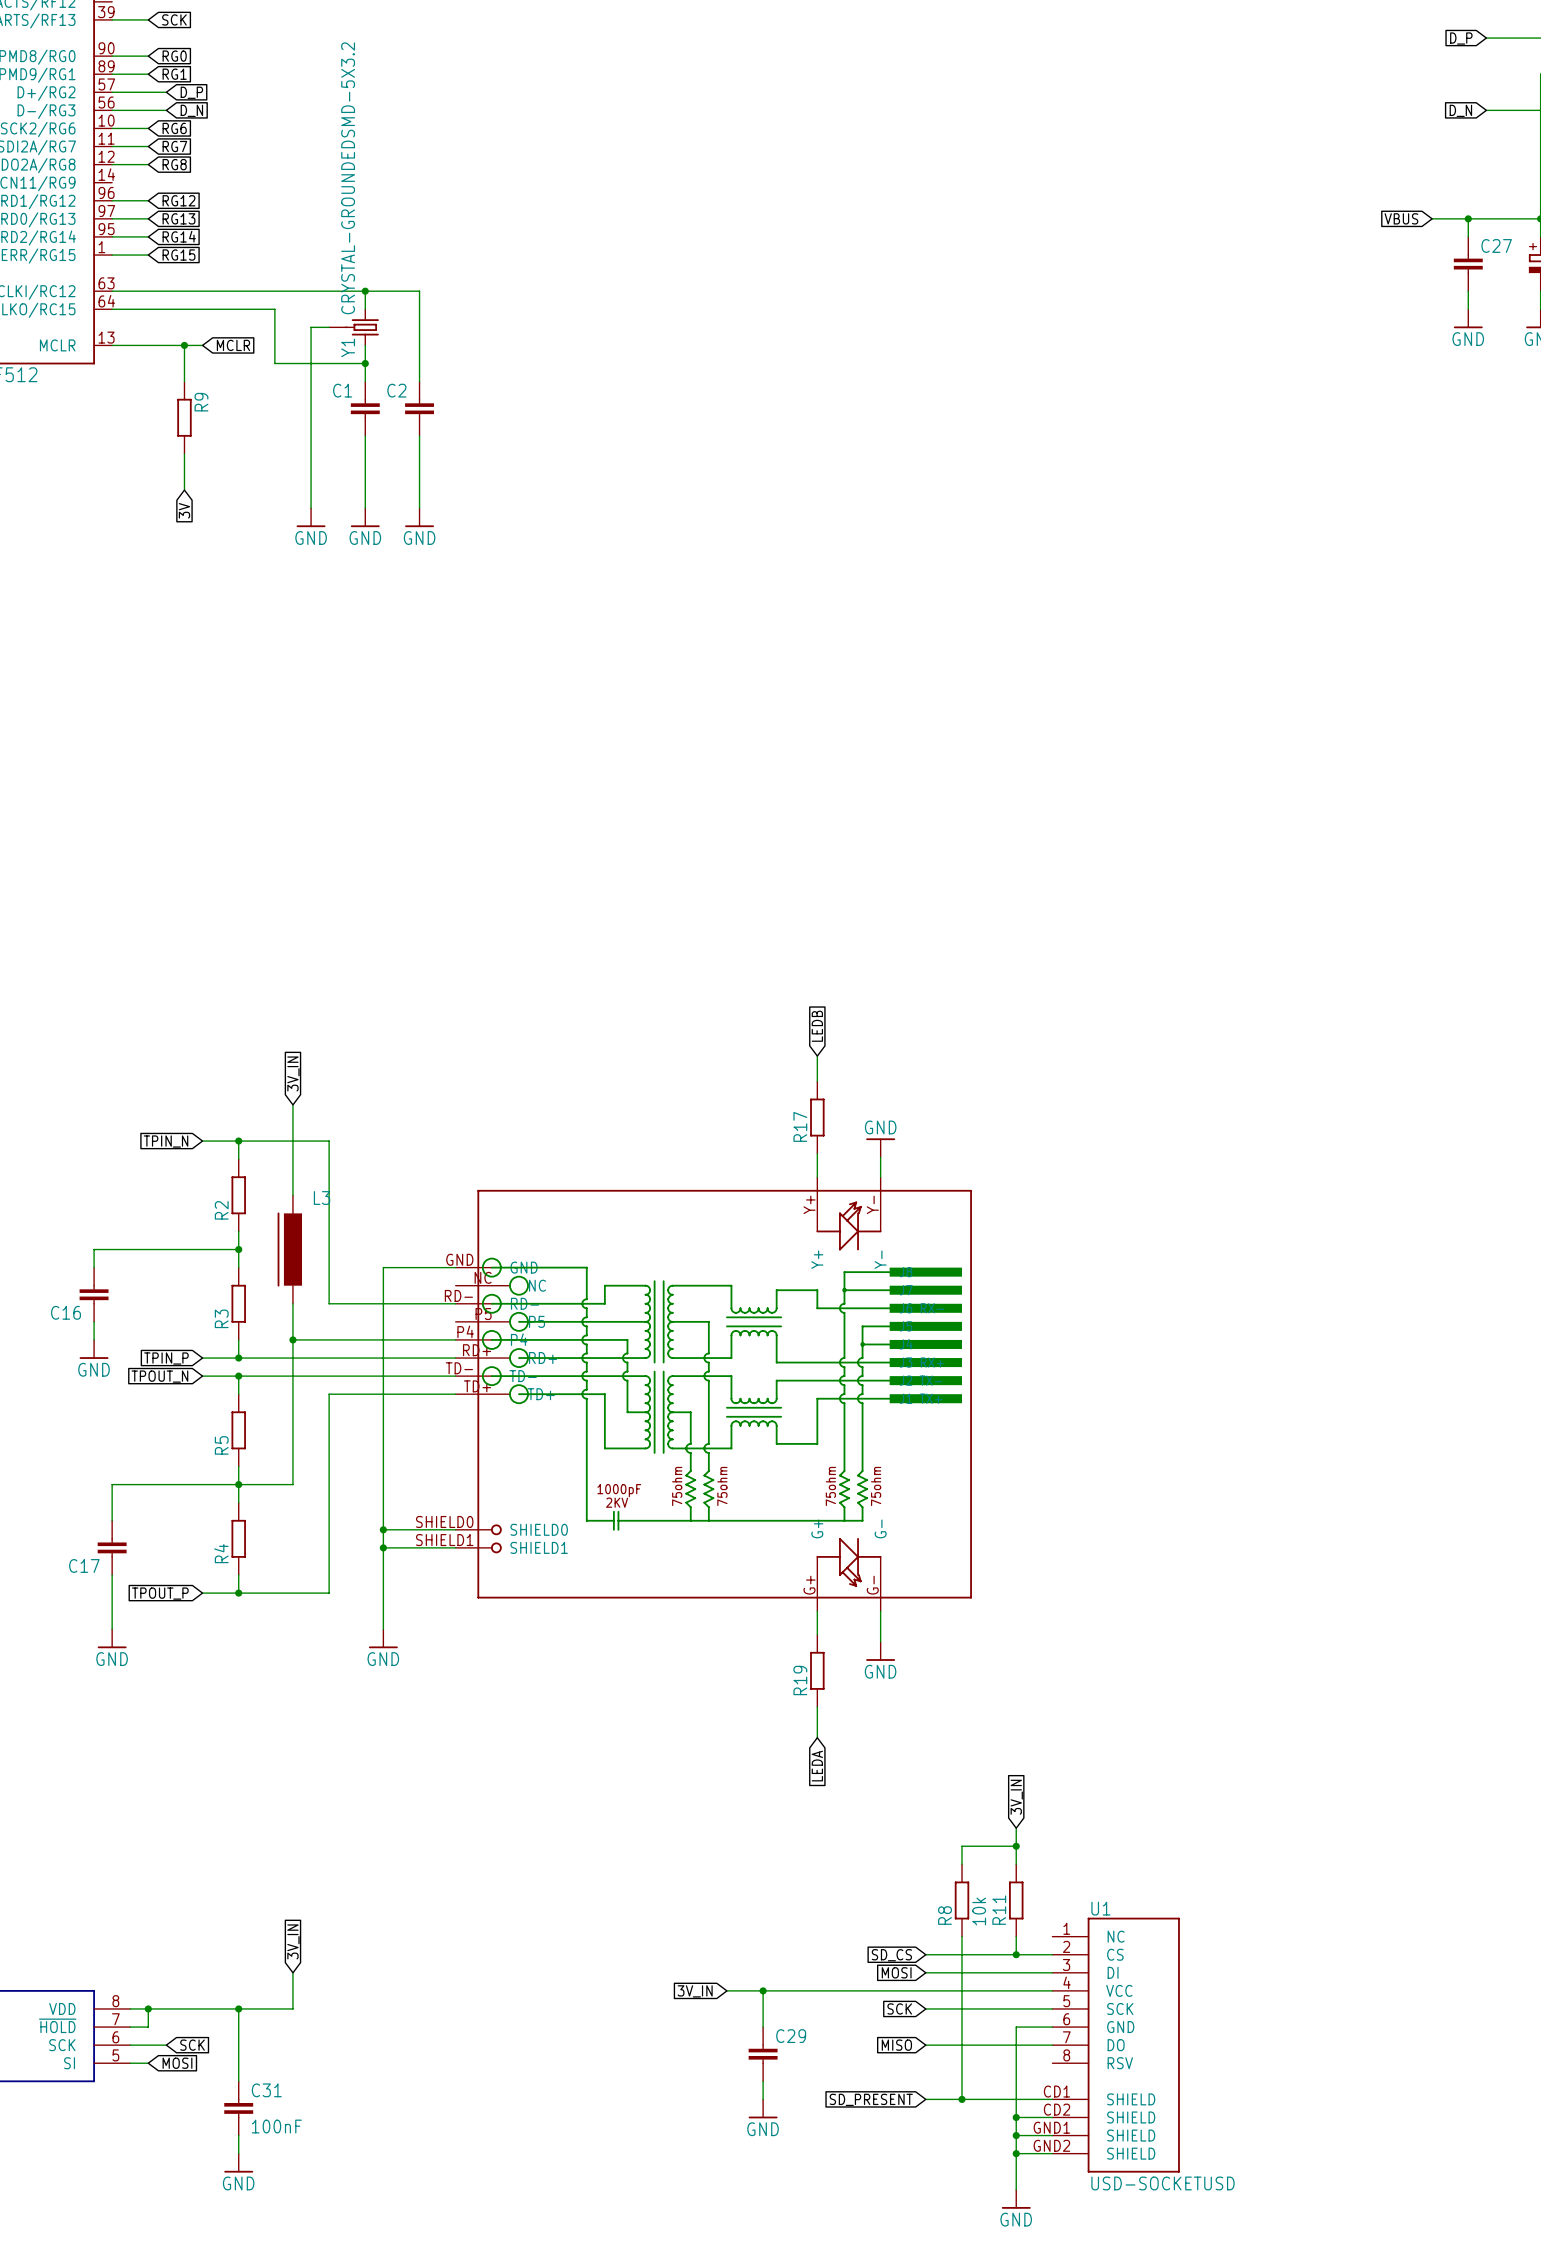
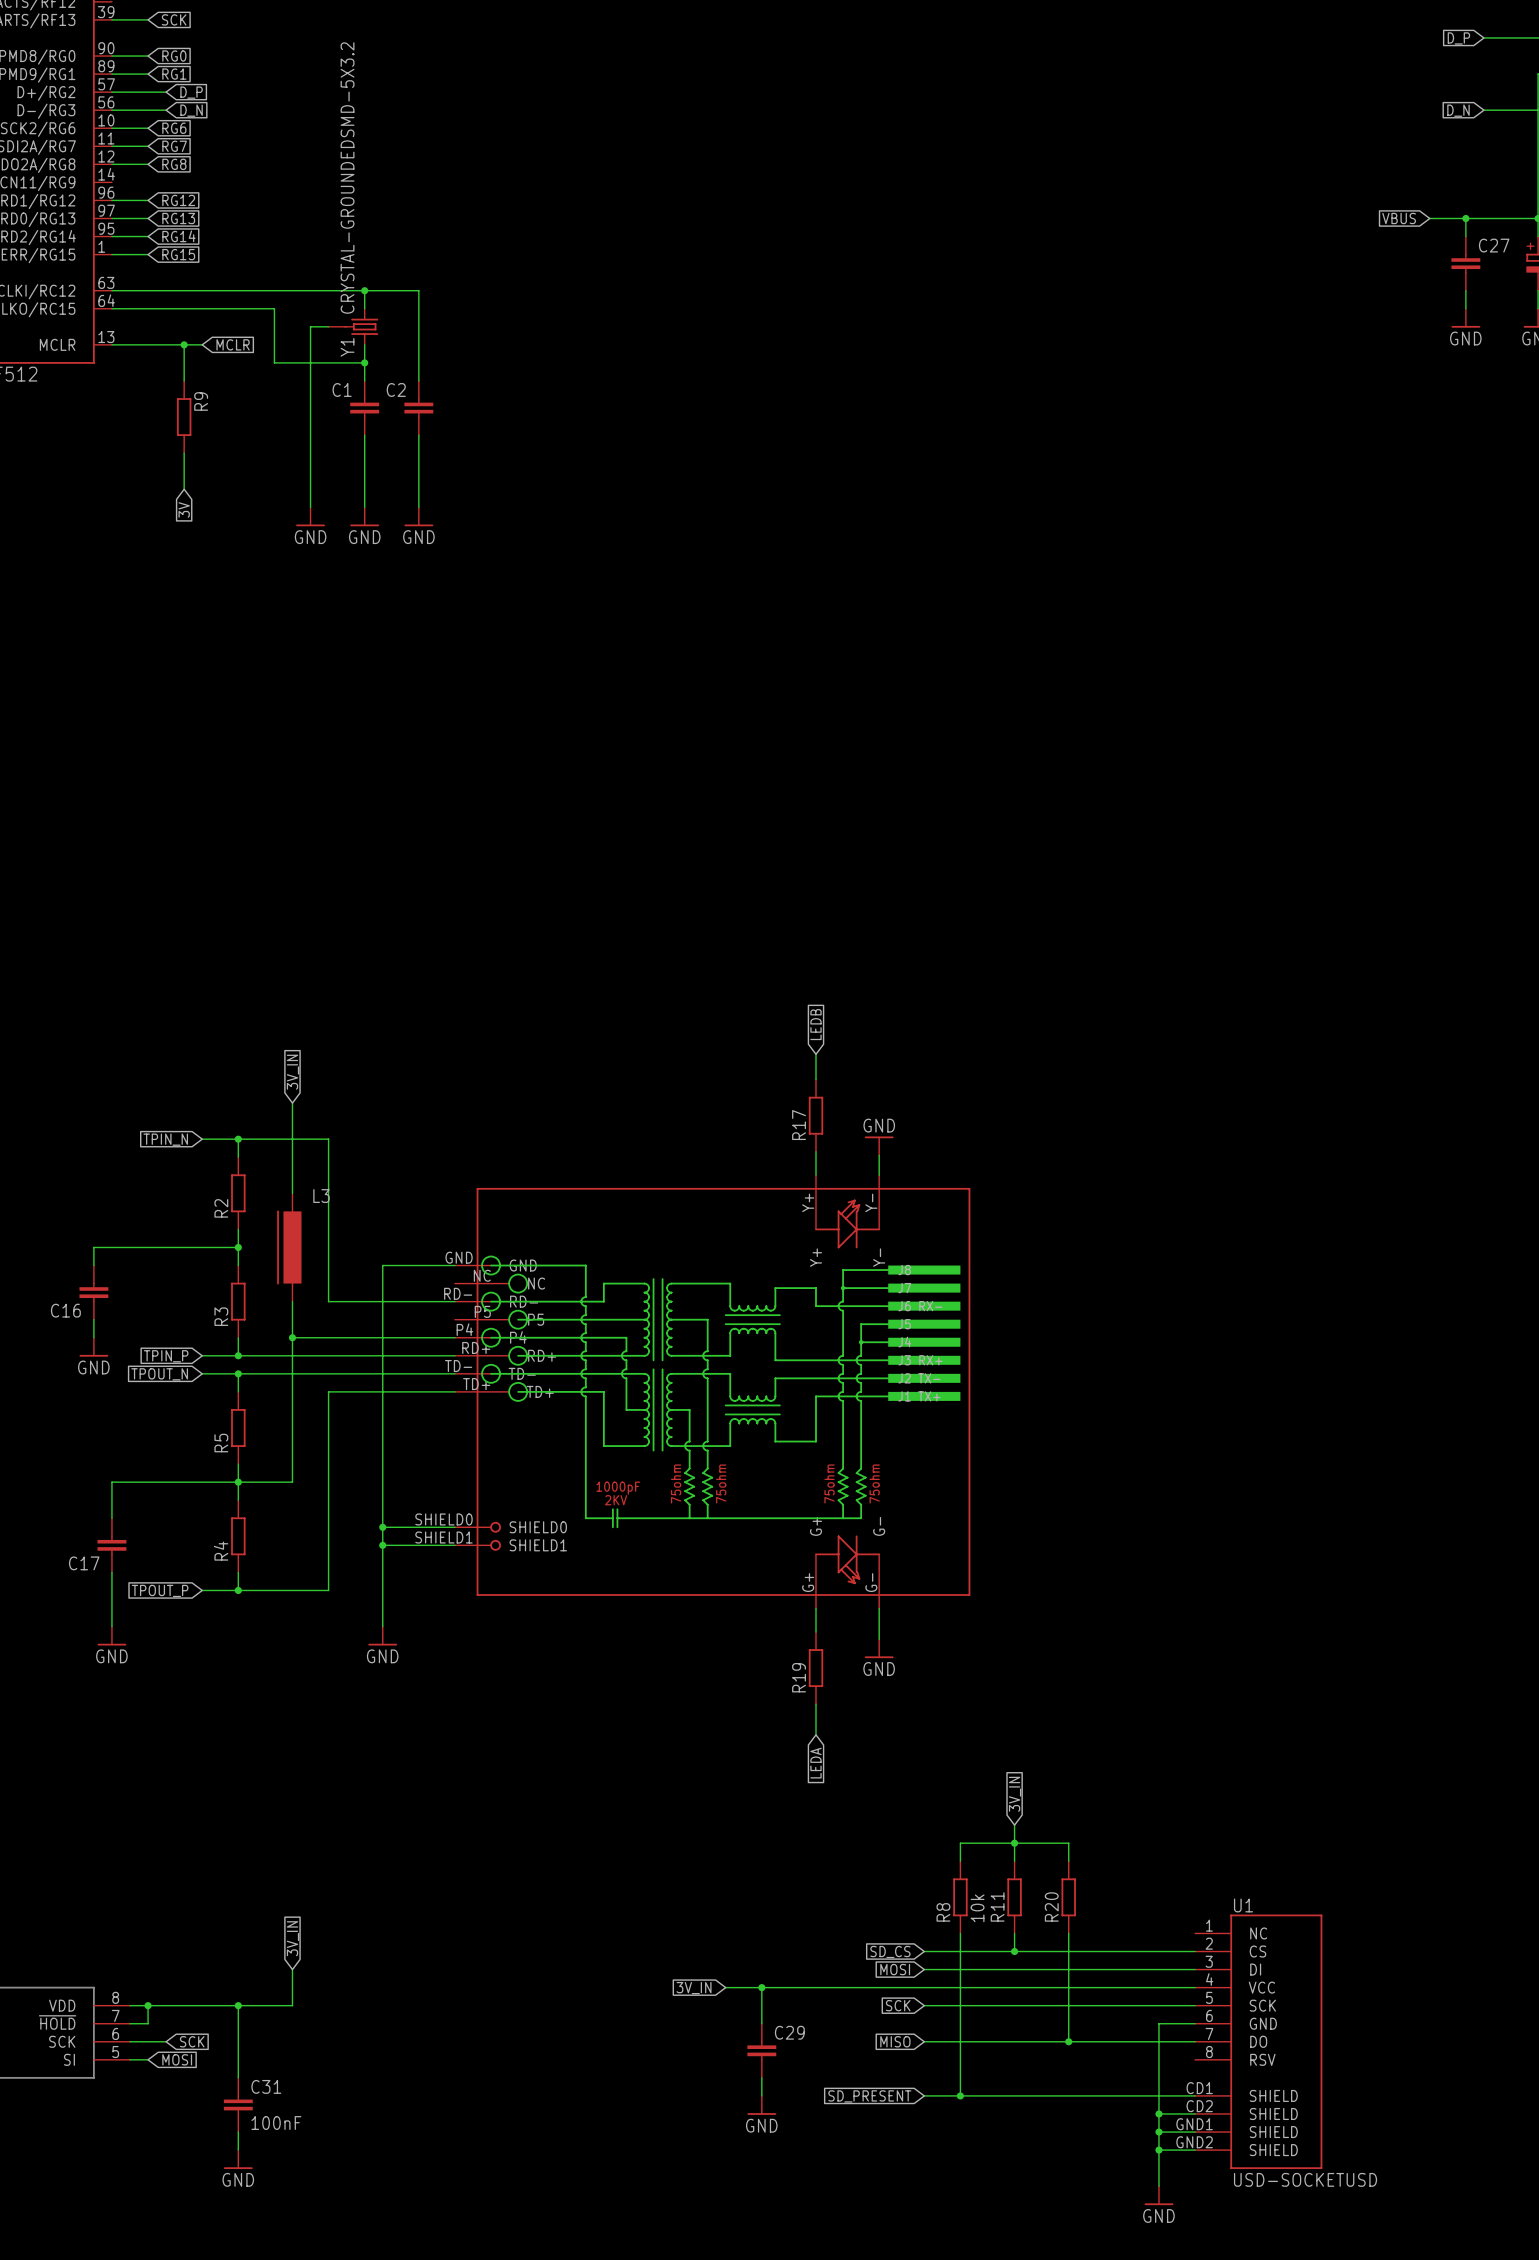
wire: none -> (1014, 1843) (1068, 1843) (1068, 1861)
R20: none -> (1068, 1897)
wire: none -> (1068, 1933) (1068, 2041)
wire: none -> (1050, 1951) (1195, 1951)
wire: none -> (1050, 1969) (1195, 1969)
wire: none -> (1050, 1987) (1195, 1987)
wire: none -> (1050, 2005) (1195, 2005)
wire: (1052, 2027) (1016, 2027) (1016, 2189) -> (1195, 2023) (1158, 2023) (1158, 2186)
wire: none -> (1050, 2041) (1195, 2041)
junction: none -> (1068, 2041)
U1 position: (1116, 2045) -> (1258, 2041)
wire: none -> (1050, 2095) (1195, 2095)
wire: (1016, 2117) (1052, 2117) -> (1158, 2113) (1195, 2113)
junction: (1016, 2117) -> none
junction: none -> (1158, 2113)
wire: (1016, 2135) (1052, 2135) -> (1158, 2132) (1195, 2132)
junction: (1016, 2135) -> none
junction: none -> (1158, 2132)
wire: (1016, 2153) (1052, 2153) -> (1158, 2150) (1195, 2150)
junction: (1016, 2153) -> none
junction: none -> (1158, 2150)
power symbol position: GND (1016, 2199) -> GND (1158, 2195)

